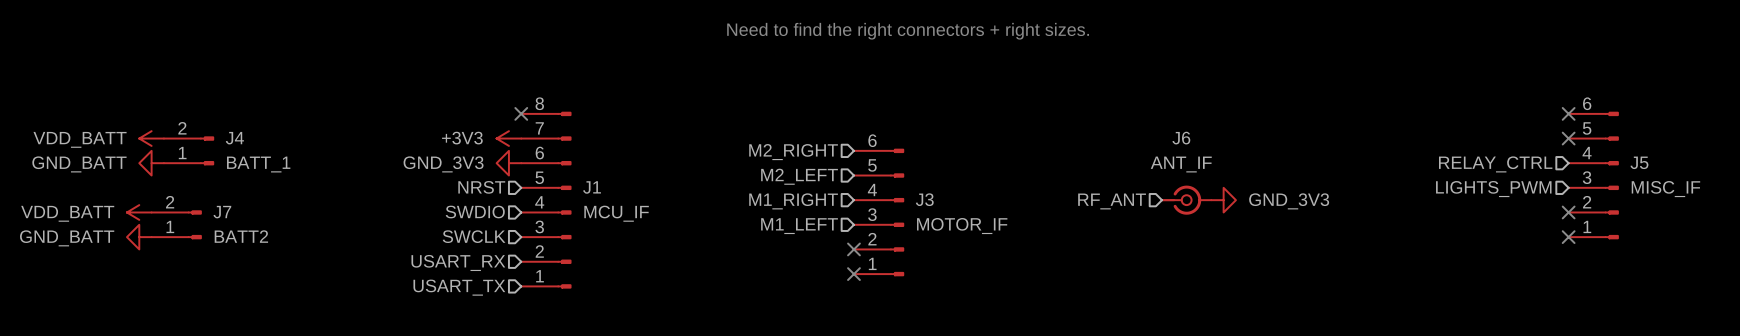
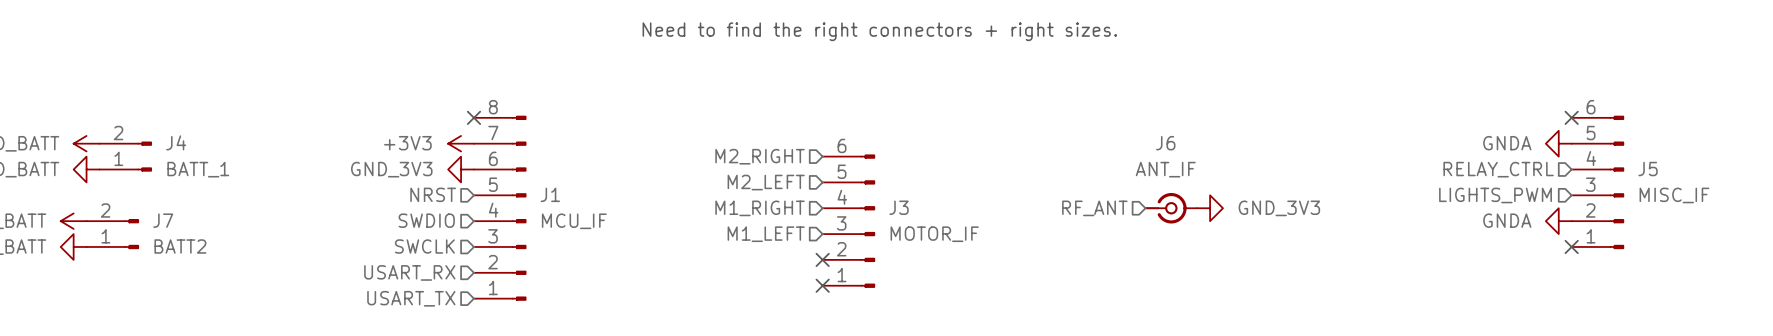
power symbol: none -> GNDA (1558, 143)
no-connect mark: (1568, 138) -> none
power symbol: none -> GNDA (1558, 221)
no-connect mark: (1568, 212) -> none

